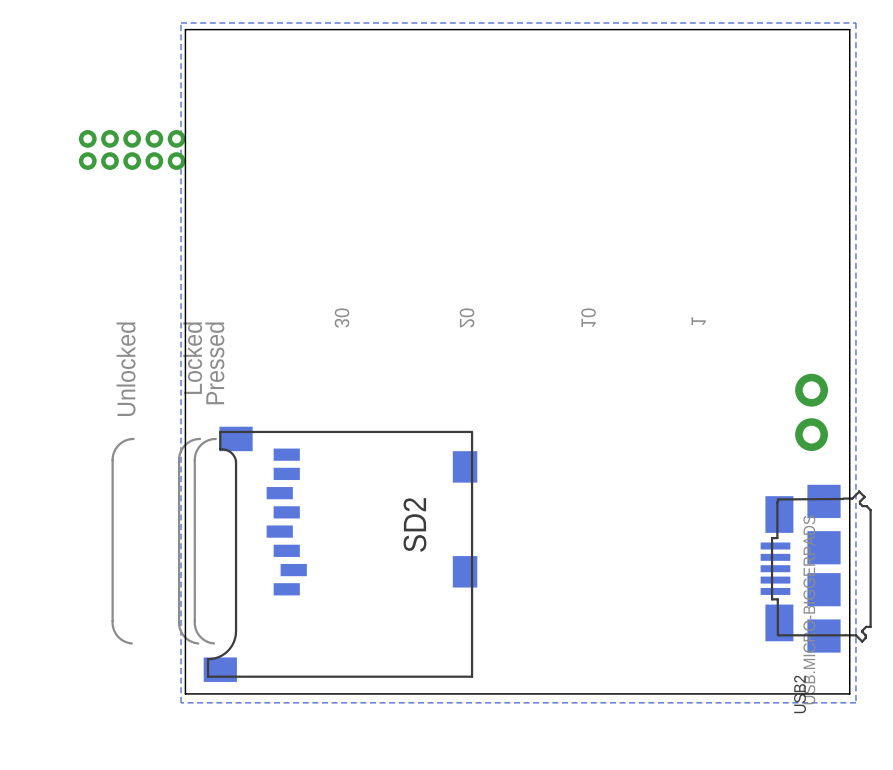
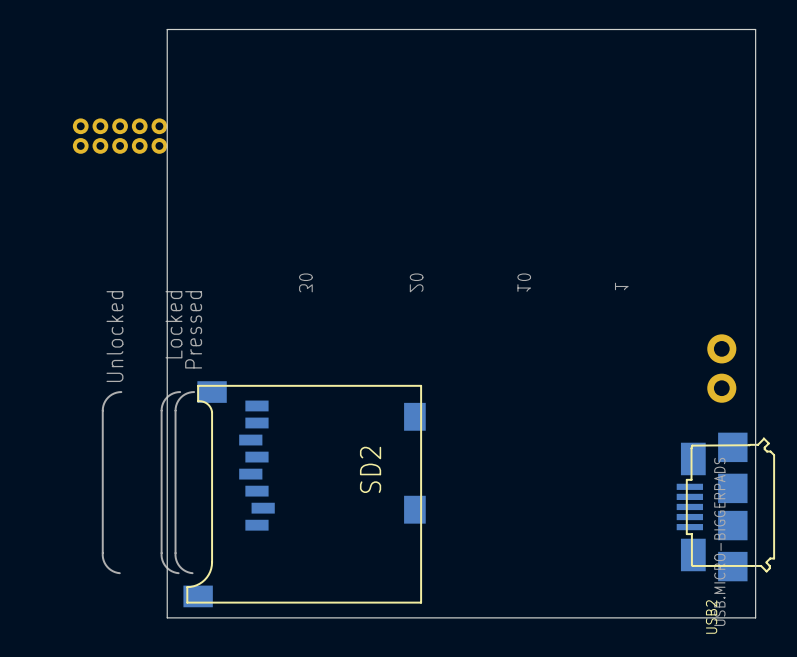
zone outline: (855, 22) (855, 702) (181, 702) (181, 22) (855, 22) -> none

